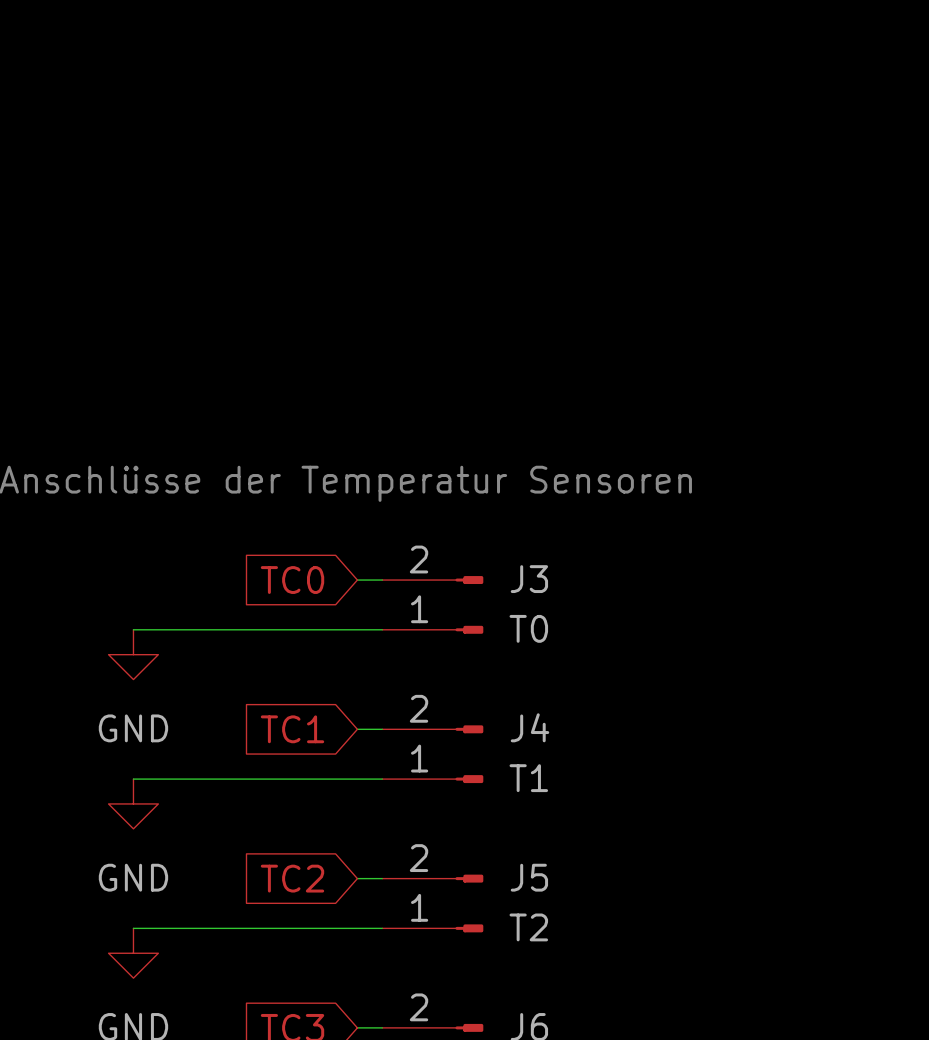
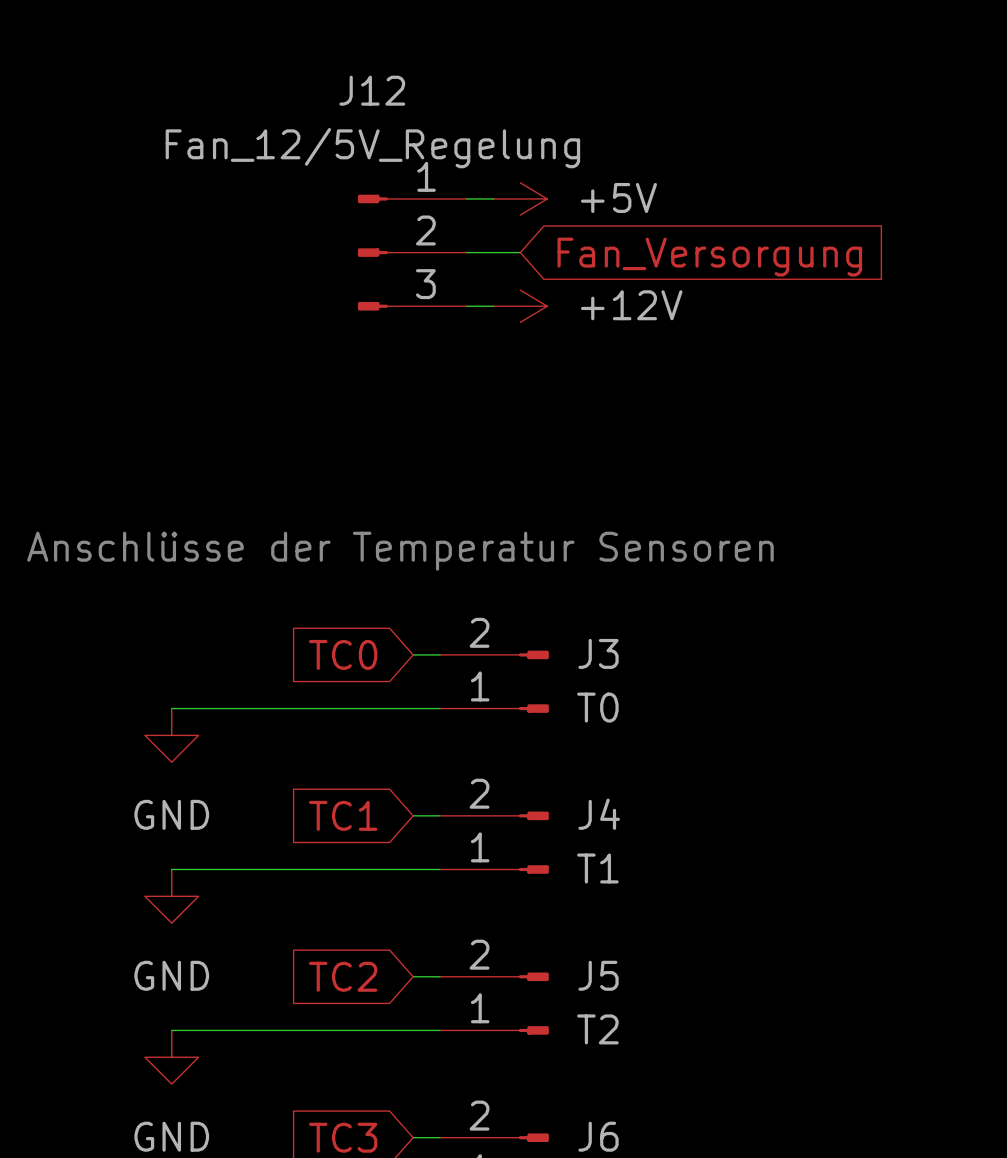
wire: none -> (466, 198) (493, 198)
power symbol: none -> +5V (520, 198)
J12: none -> Fan_12/5V_Regelung (412, 252)
wire: none -> (466, 252) (520, 252)
global label: none -> Fan_Versorgung (709, 257)
wire: none -> (466, 306) (493, 306)
power symbol: none -> +12V (520, 306)

